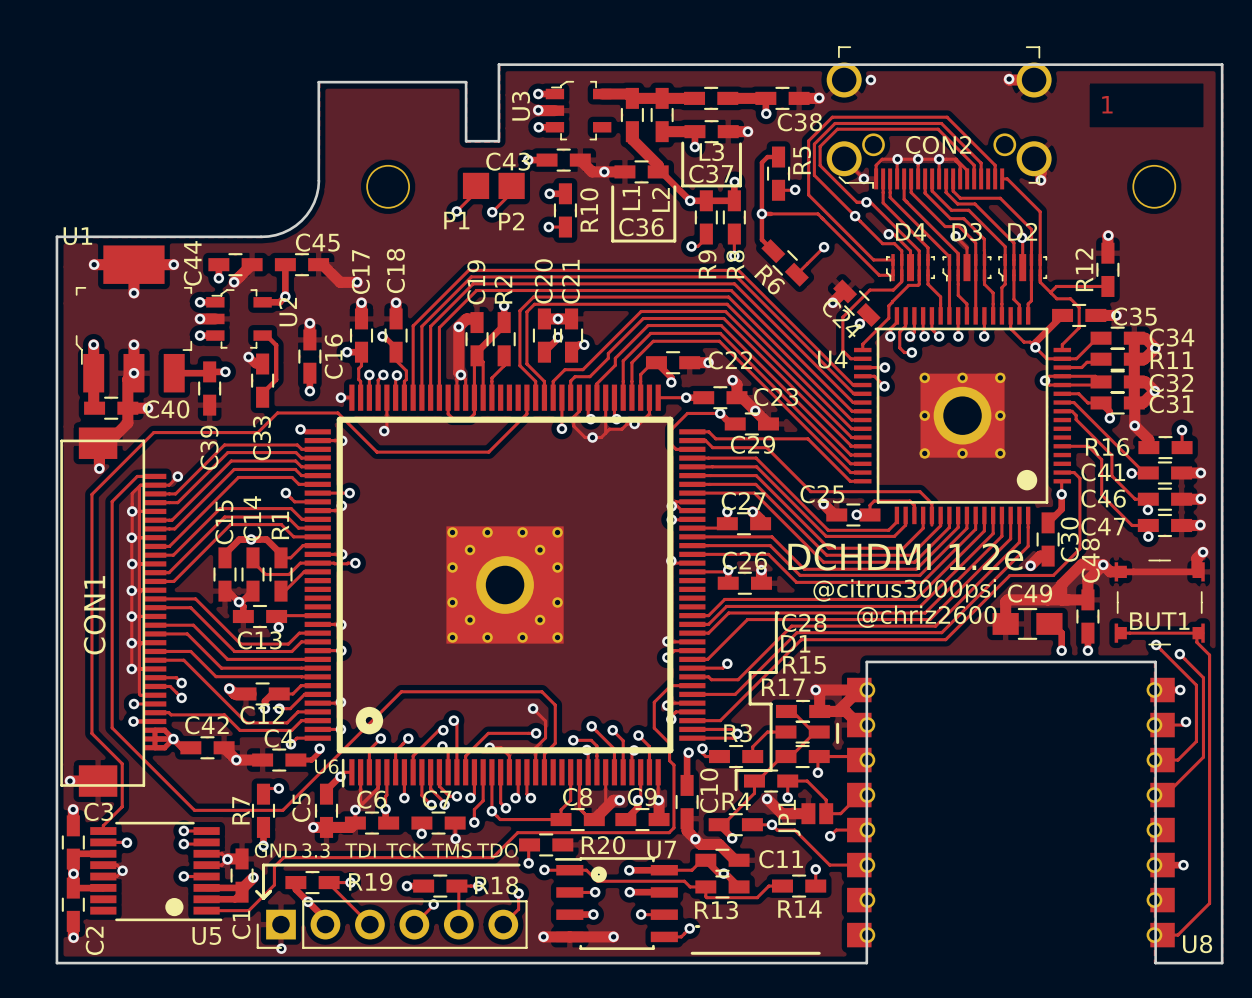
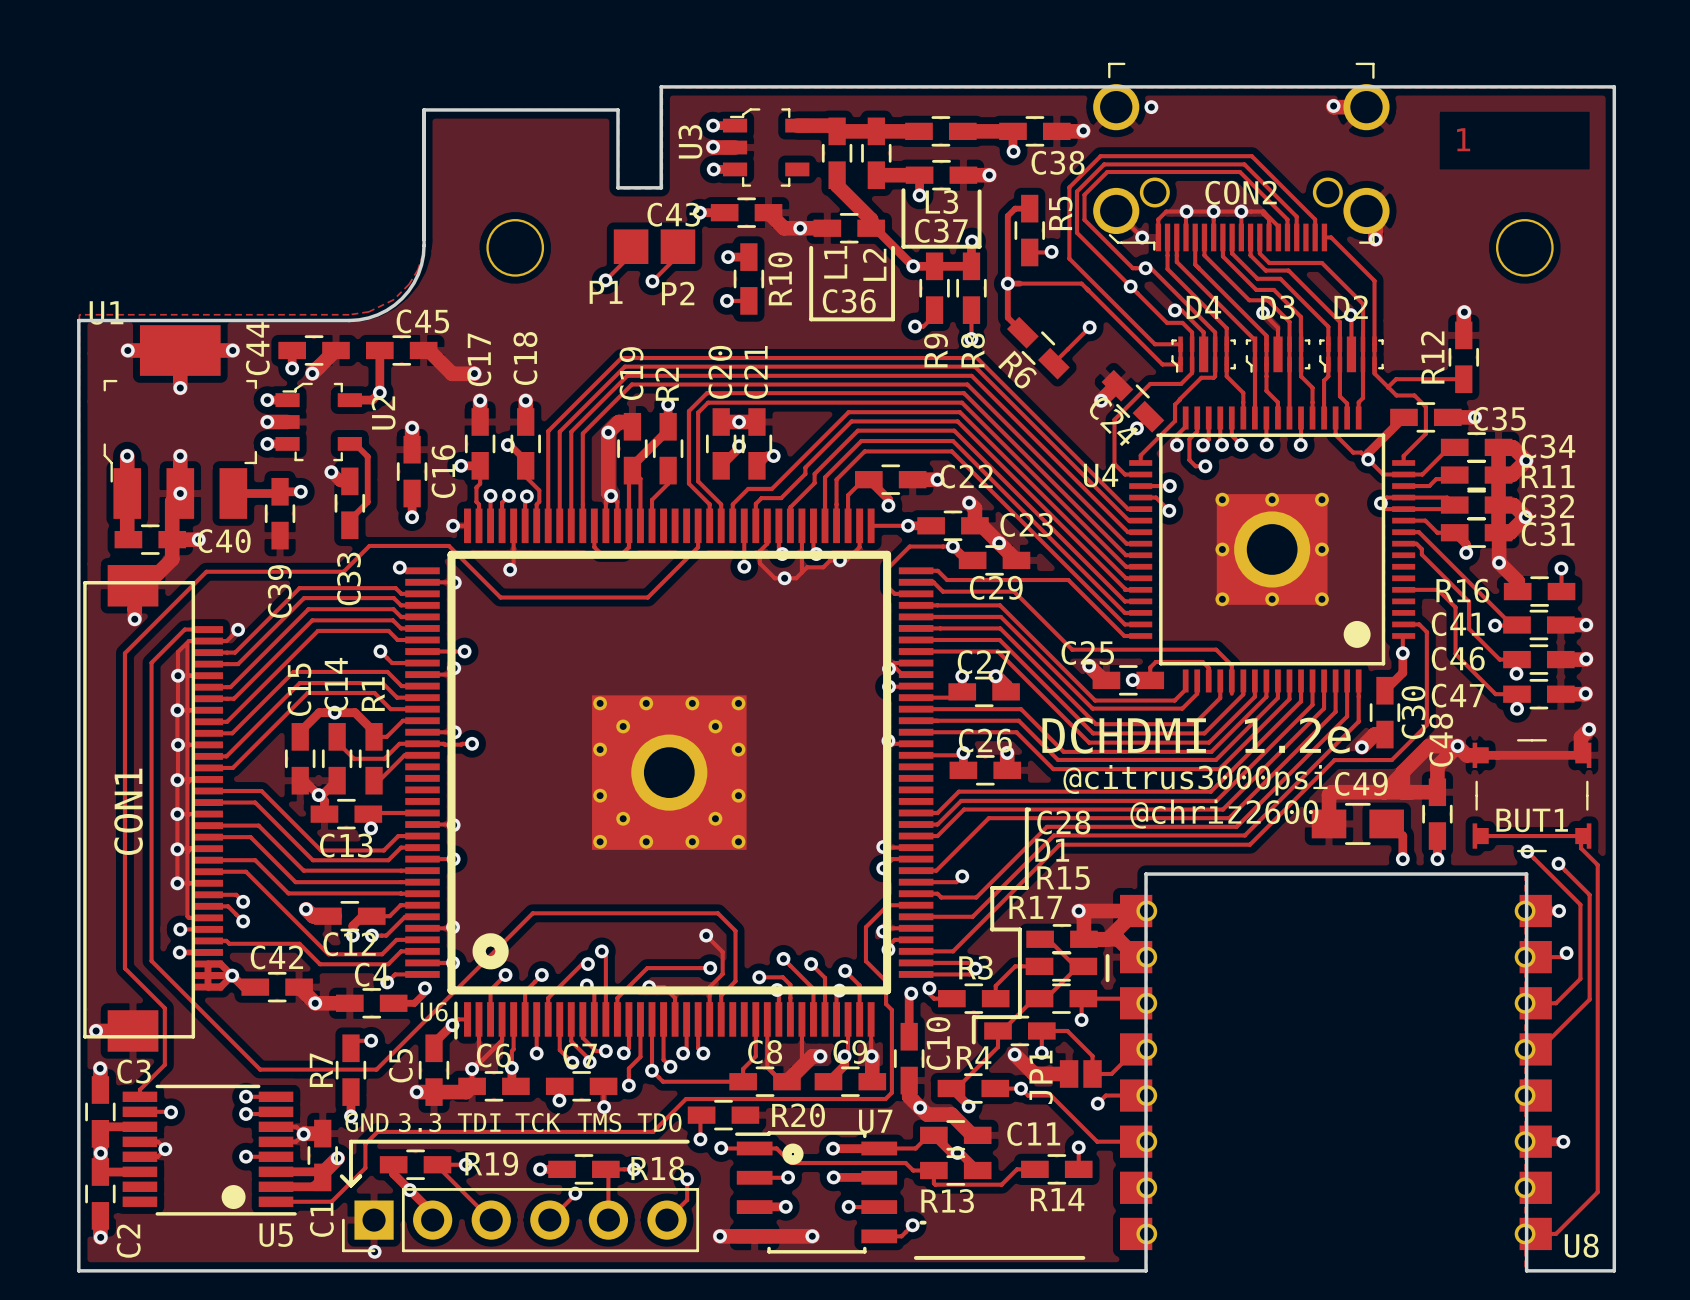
board edge: (318, 180) (314, 202) (301, 220) (283, 232) (261, 236) -> none
board edge: (260, 236) (56, 236) (56, 241) -> (424, 109) (423, 255) (418, 274) (408, 291) (386, 310) (368, 318) (349, 320) (78, 320)

